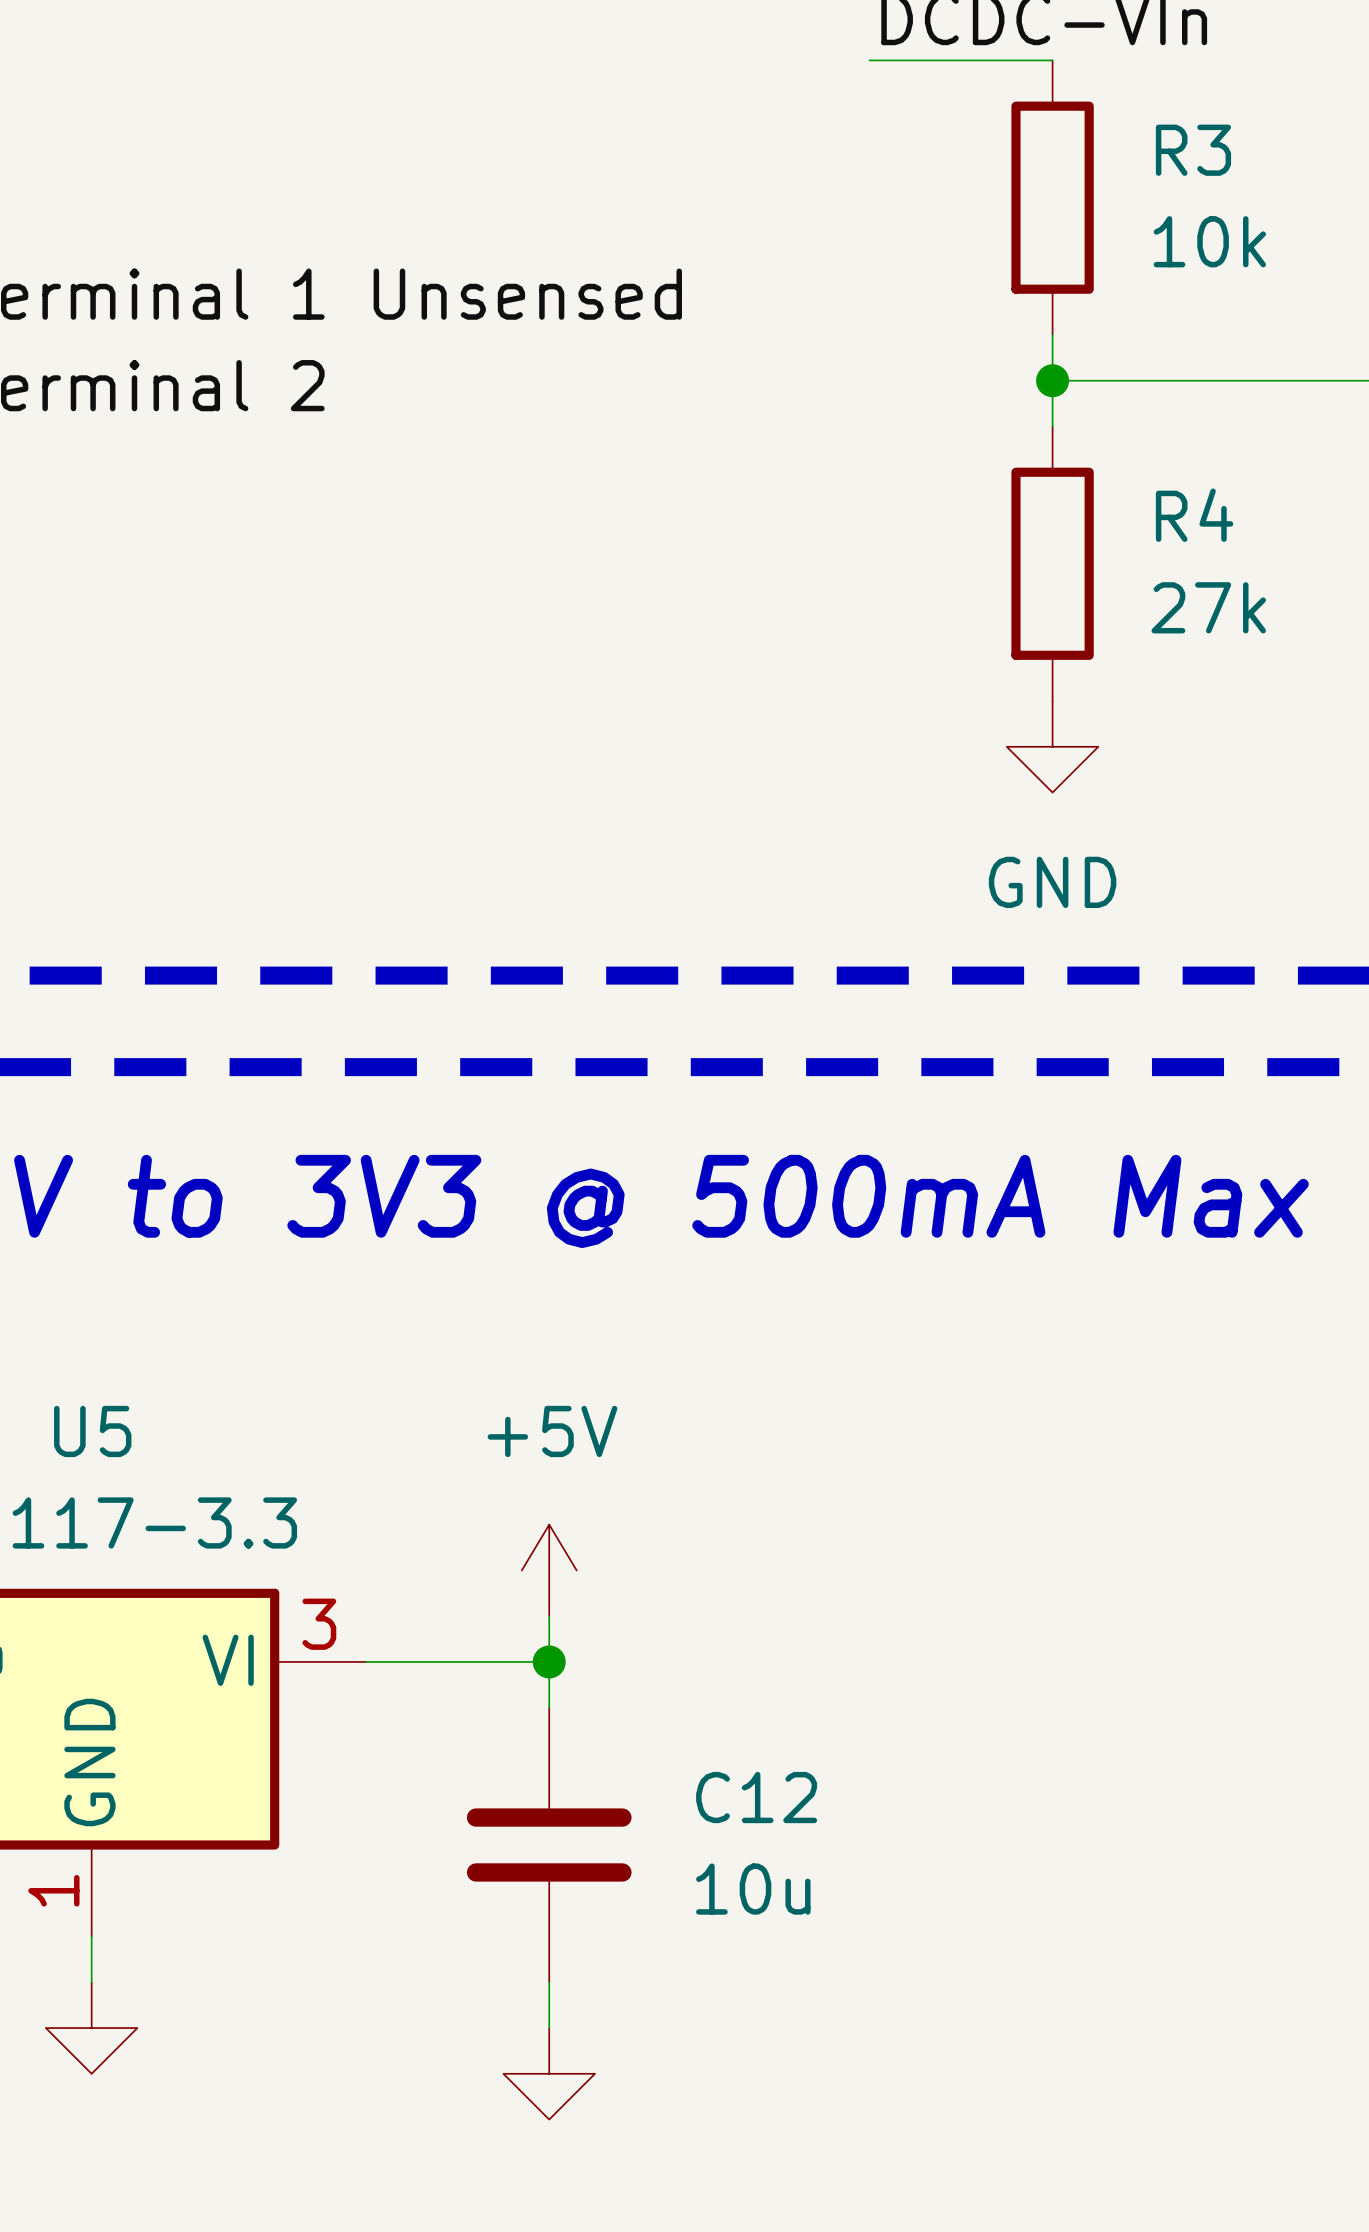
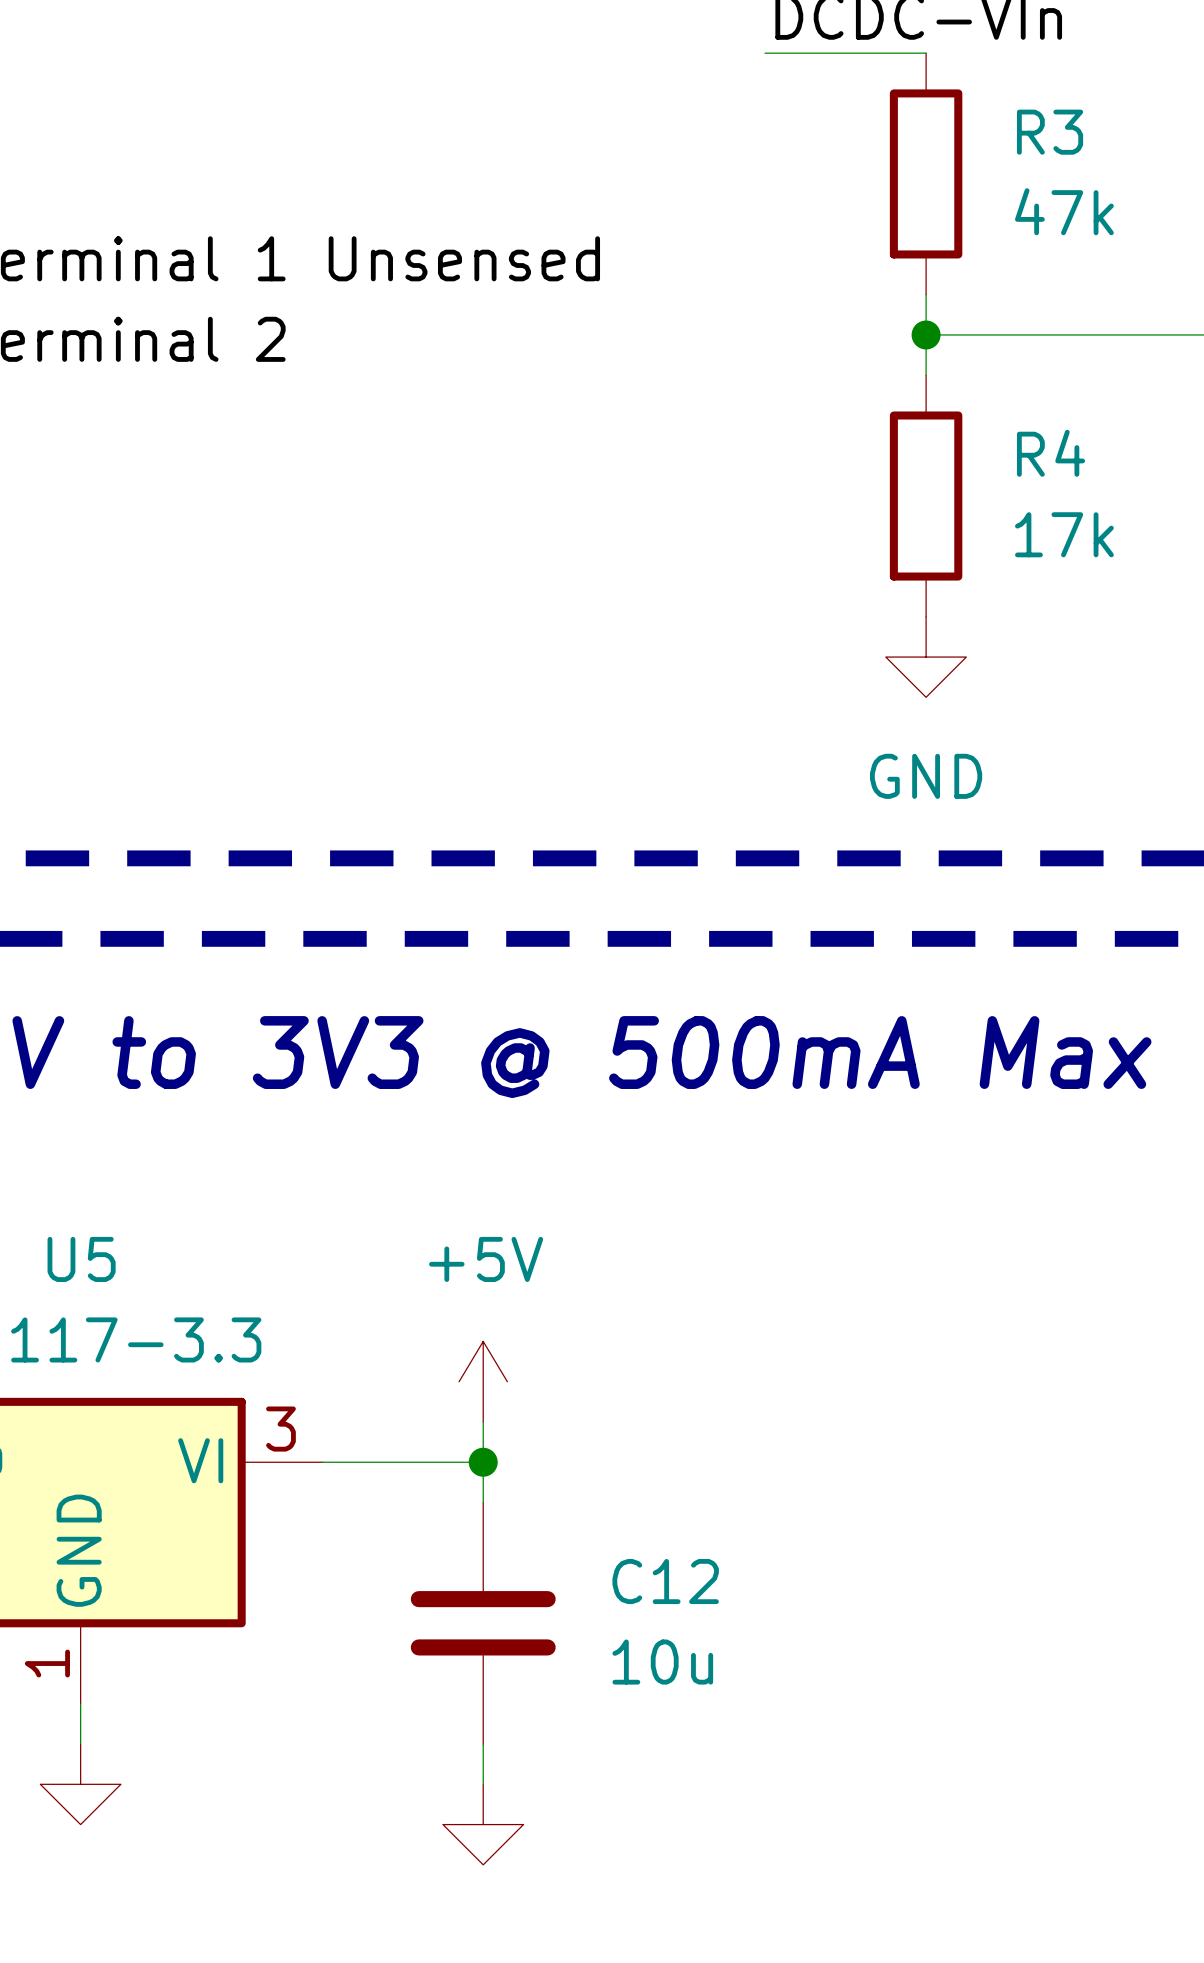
R3 value: 10k (1209, 241) -> 47k (1064, 211)
R4 value: 27k (1208, 607) -> 17k (1064, 534)

